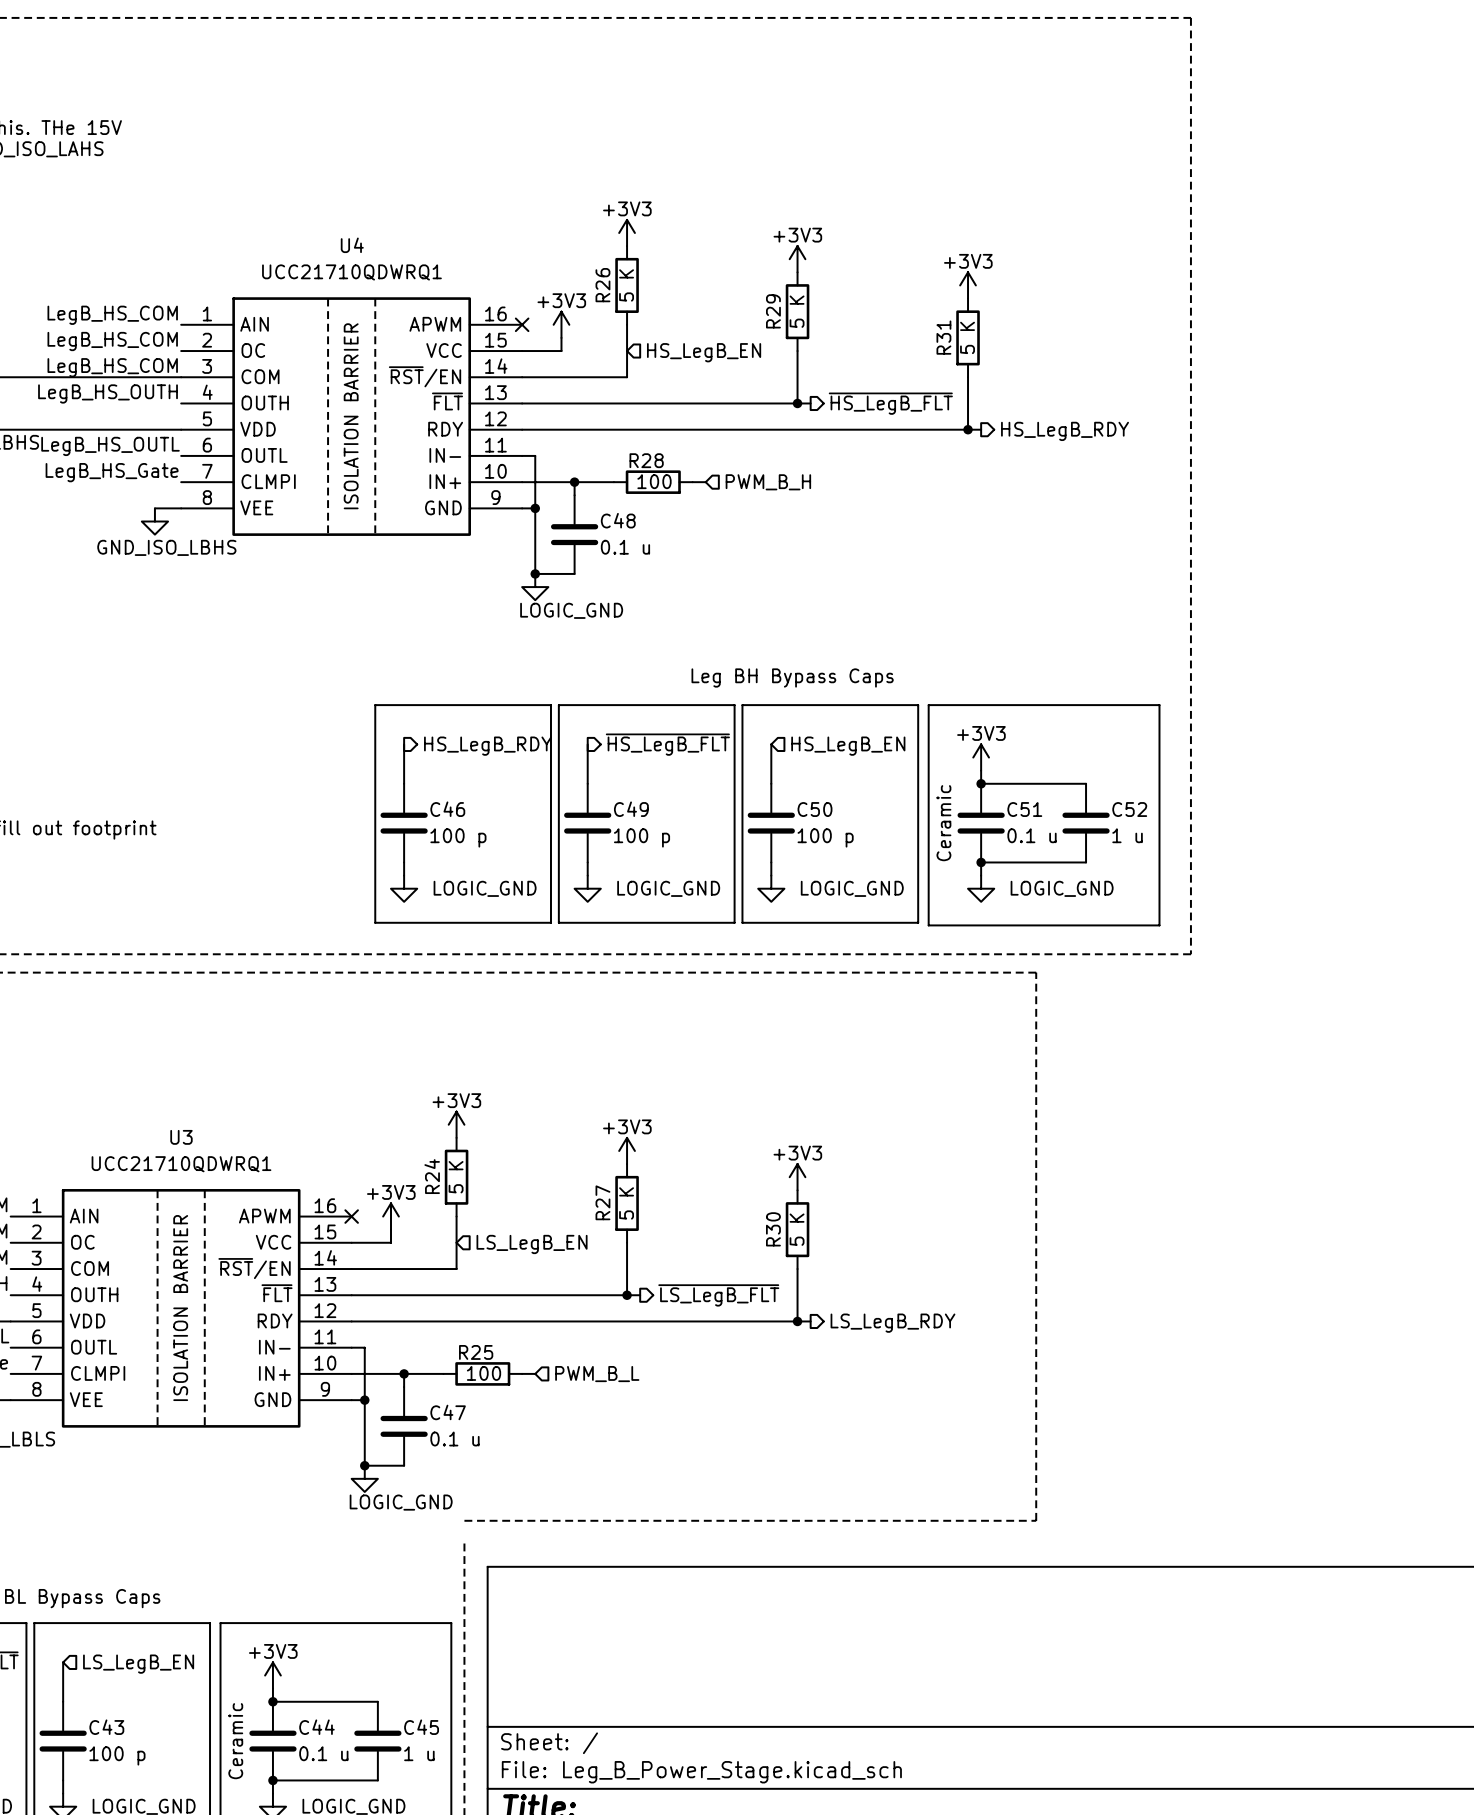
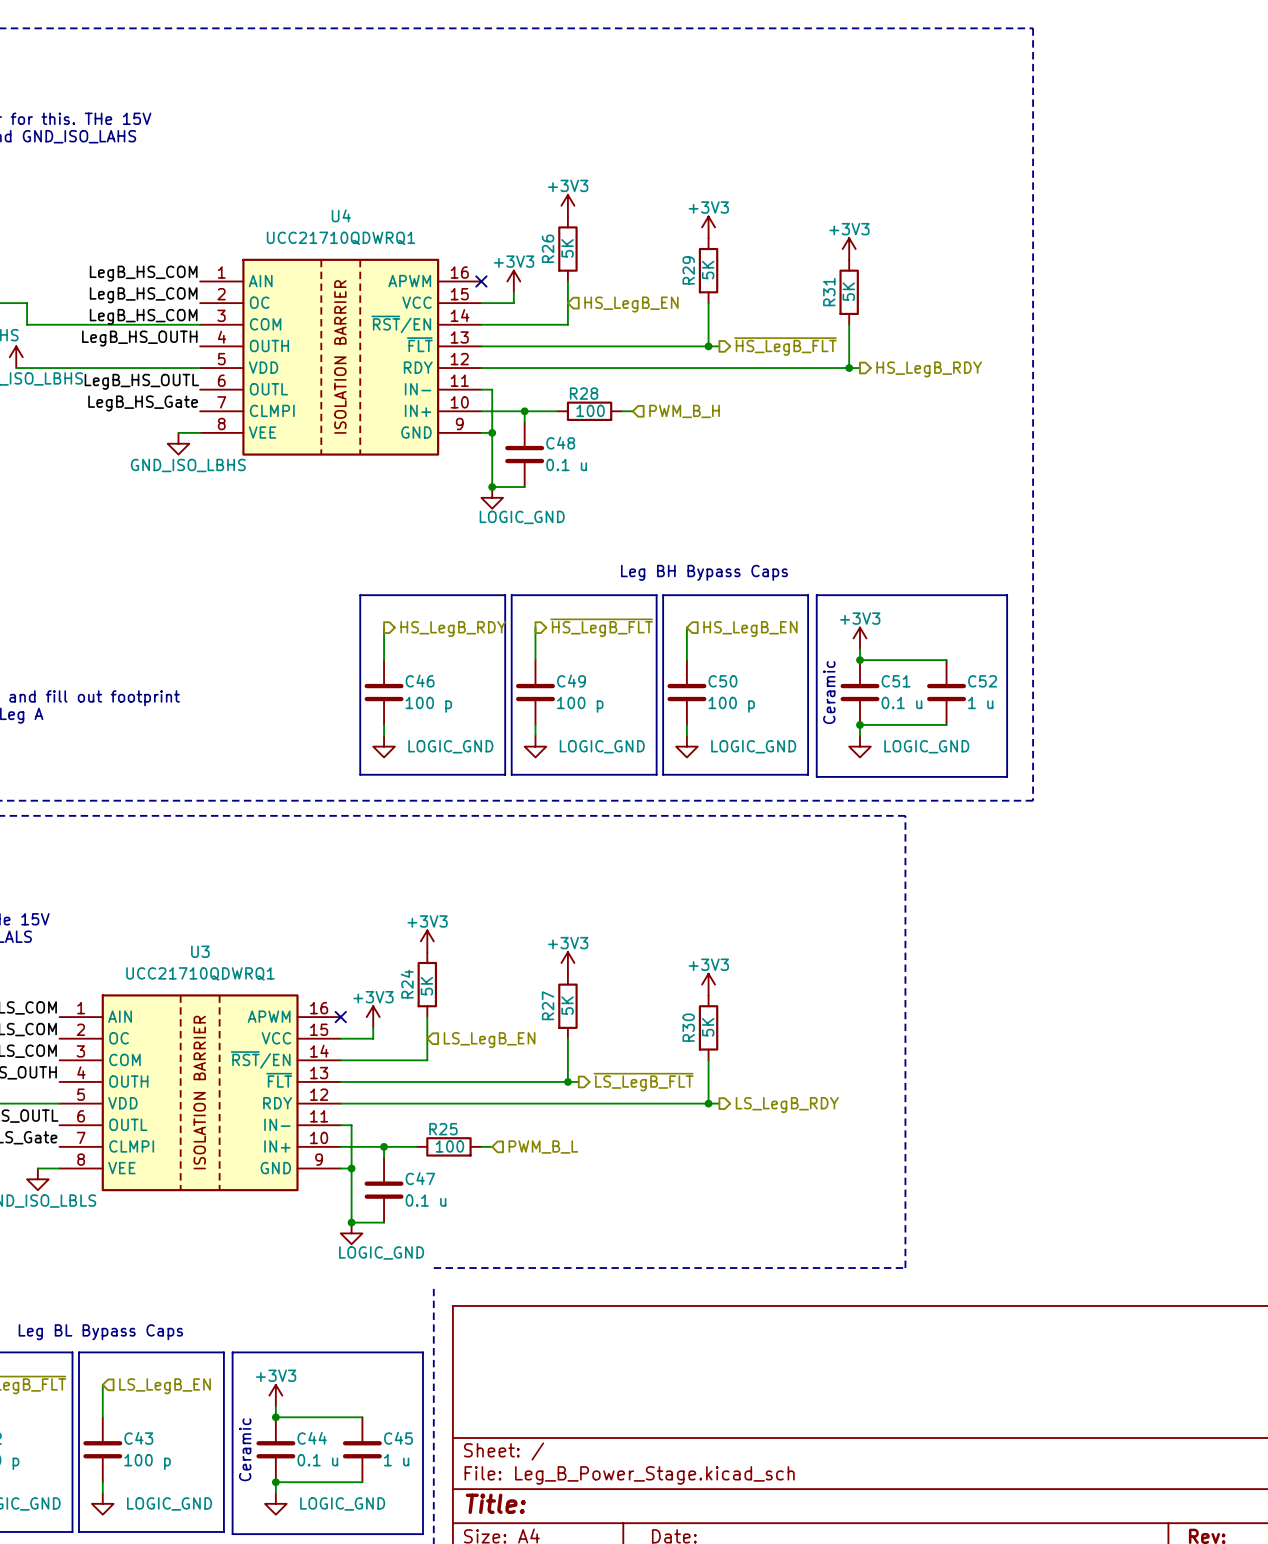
R26 value: 5 K (626, 285) -> 5K (567, 248)
R29 value: 5 K (797, 311) -> 5K (708, 270)
R31 value: 5 K (967, 337) -> 5K (848, 291)
R24 value: 5 K (456, 1177) -> 5K (426, 986)
R27 value: 5 K (626, 1203) -> 5K (567, 1005)
R30 value: 5 K (797, 1229) -> 5K (708, 1027)

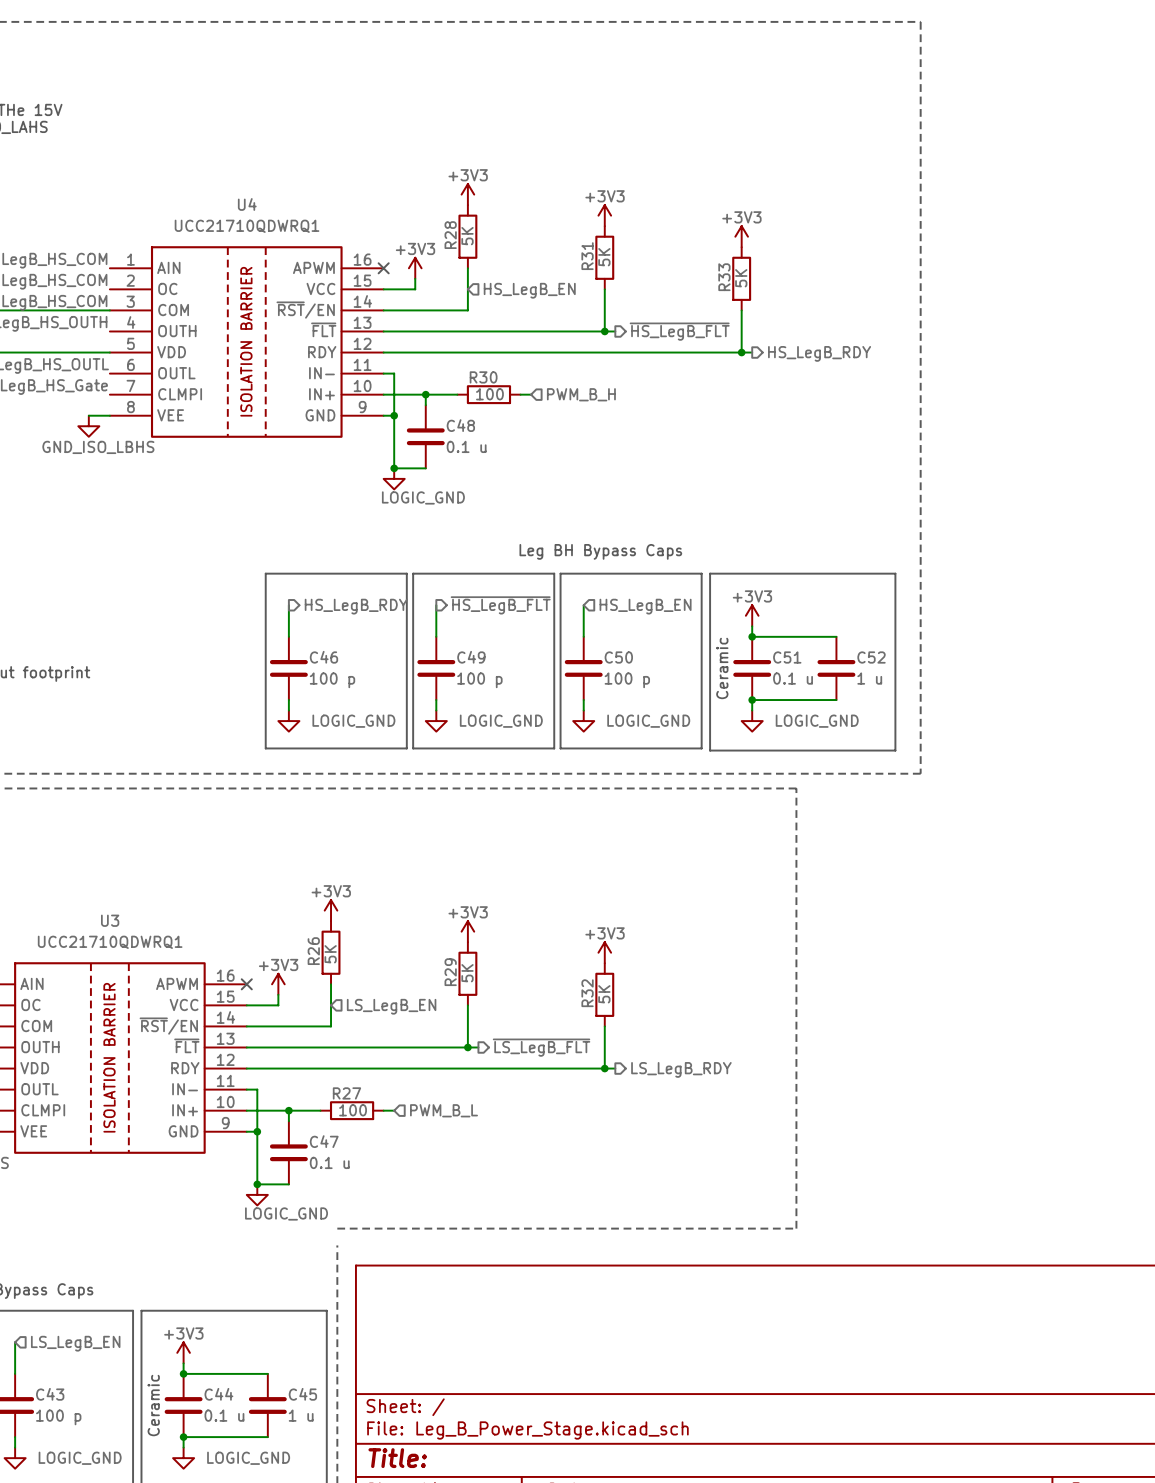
R26 name: R26 (548, 248) -> R28 (450, 235)
R29 name: R29 (688, 270) -> R31 (587, 256)
R31 name: R31 (829, 292) -> R33 (724, 277)
R28 name: R28 (584, 393) -> R30 (483, 377)
R24 name: R24 (407, 984) -> R26 (313, 951)
R27 name: R27 (548, 1005) -> R29 (450, 972)
R30 name: R30 (688, 1027) -> R32 (587, 993)
R25 name: R25 (443, 1129) -> R27 (346, 1093)

